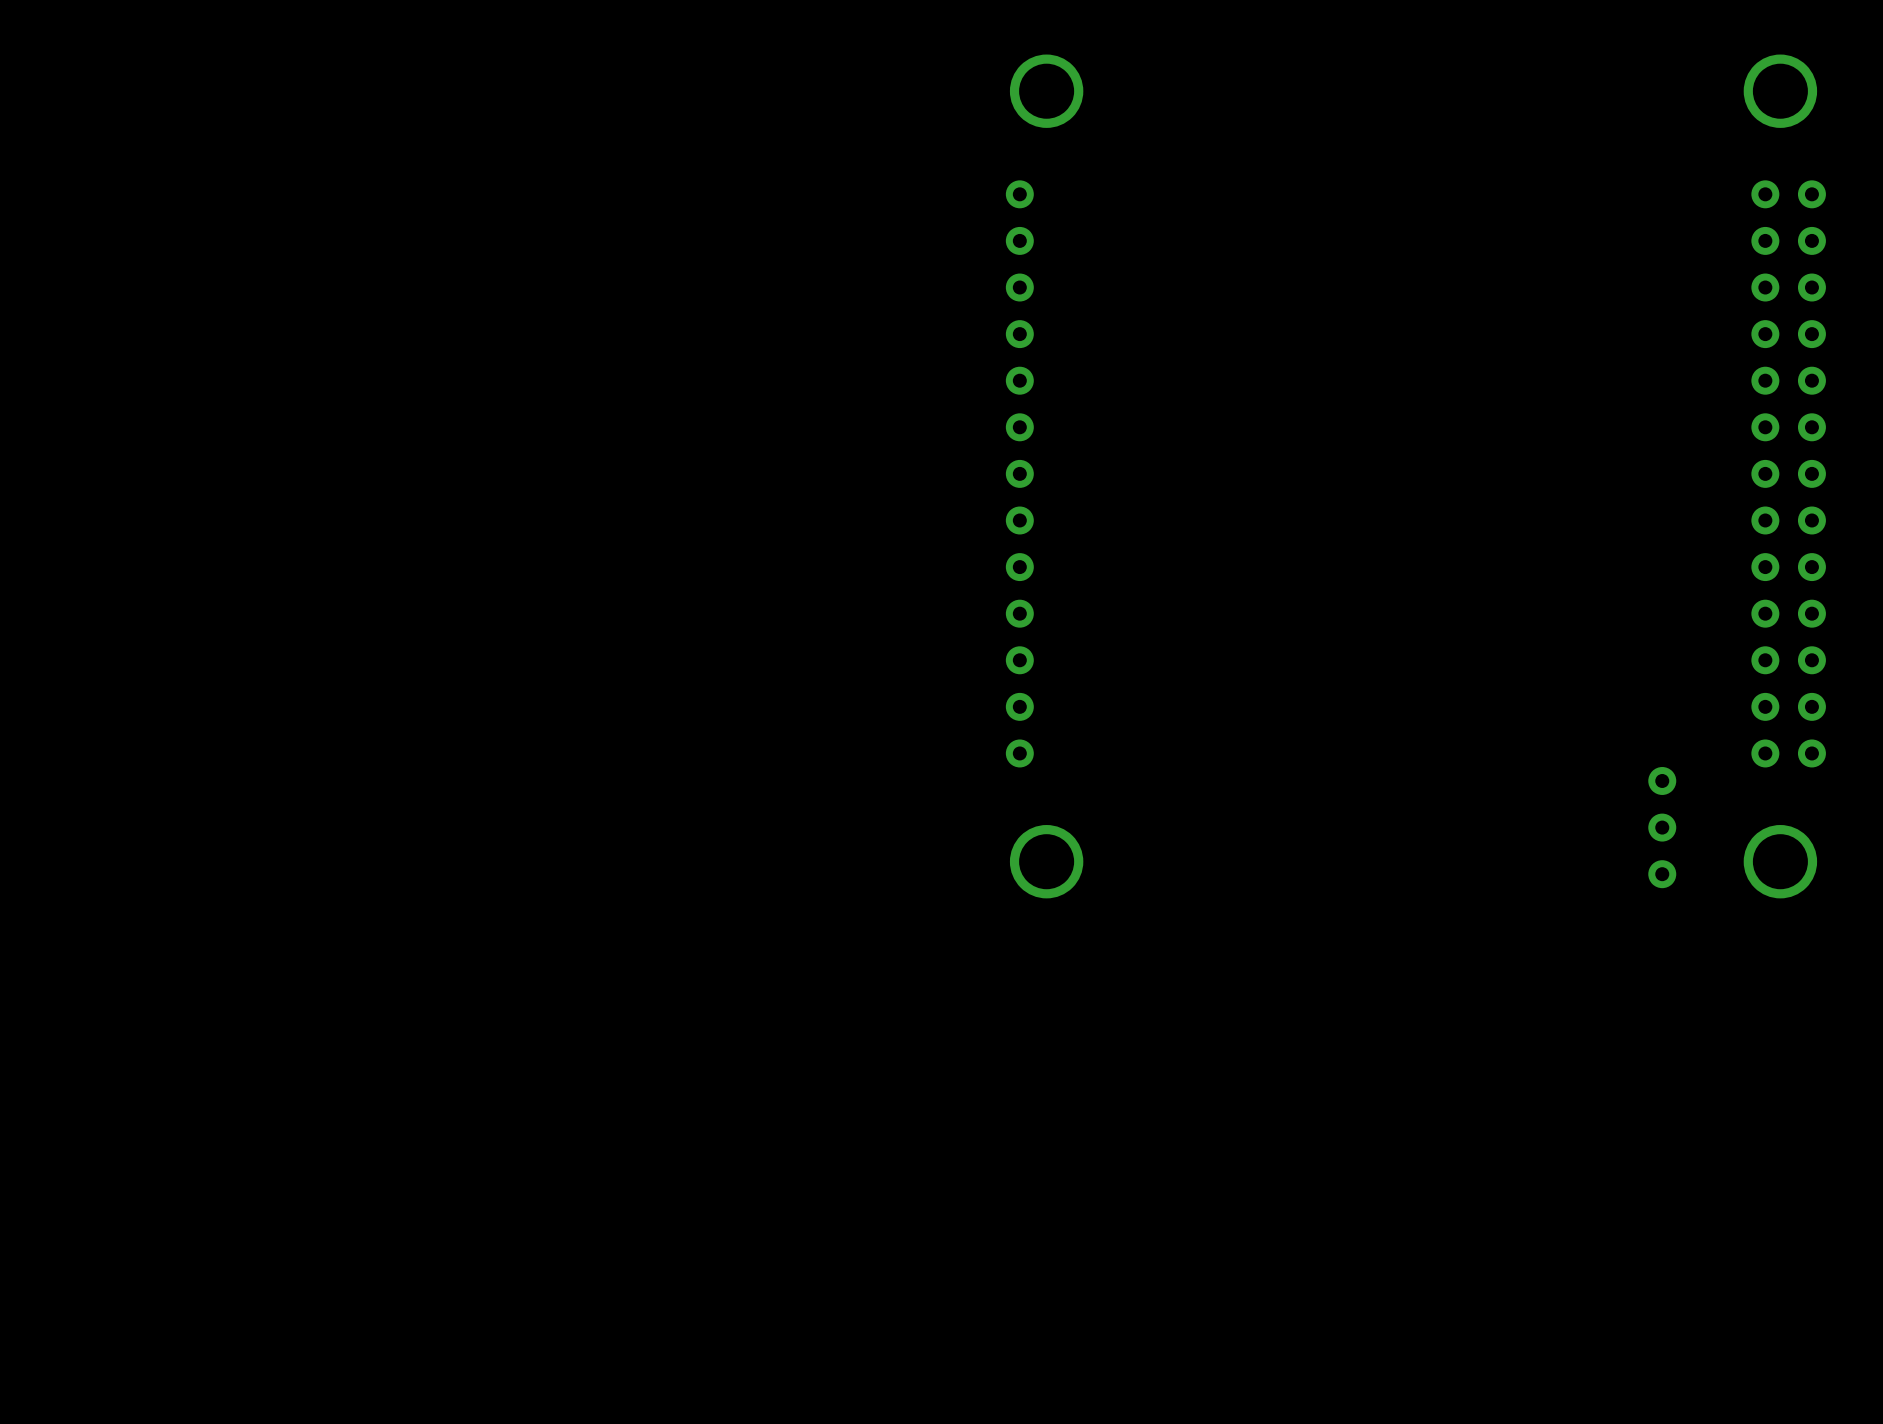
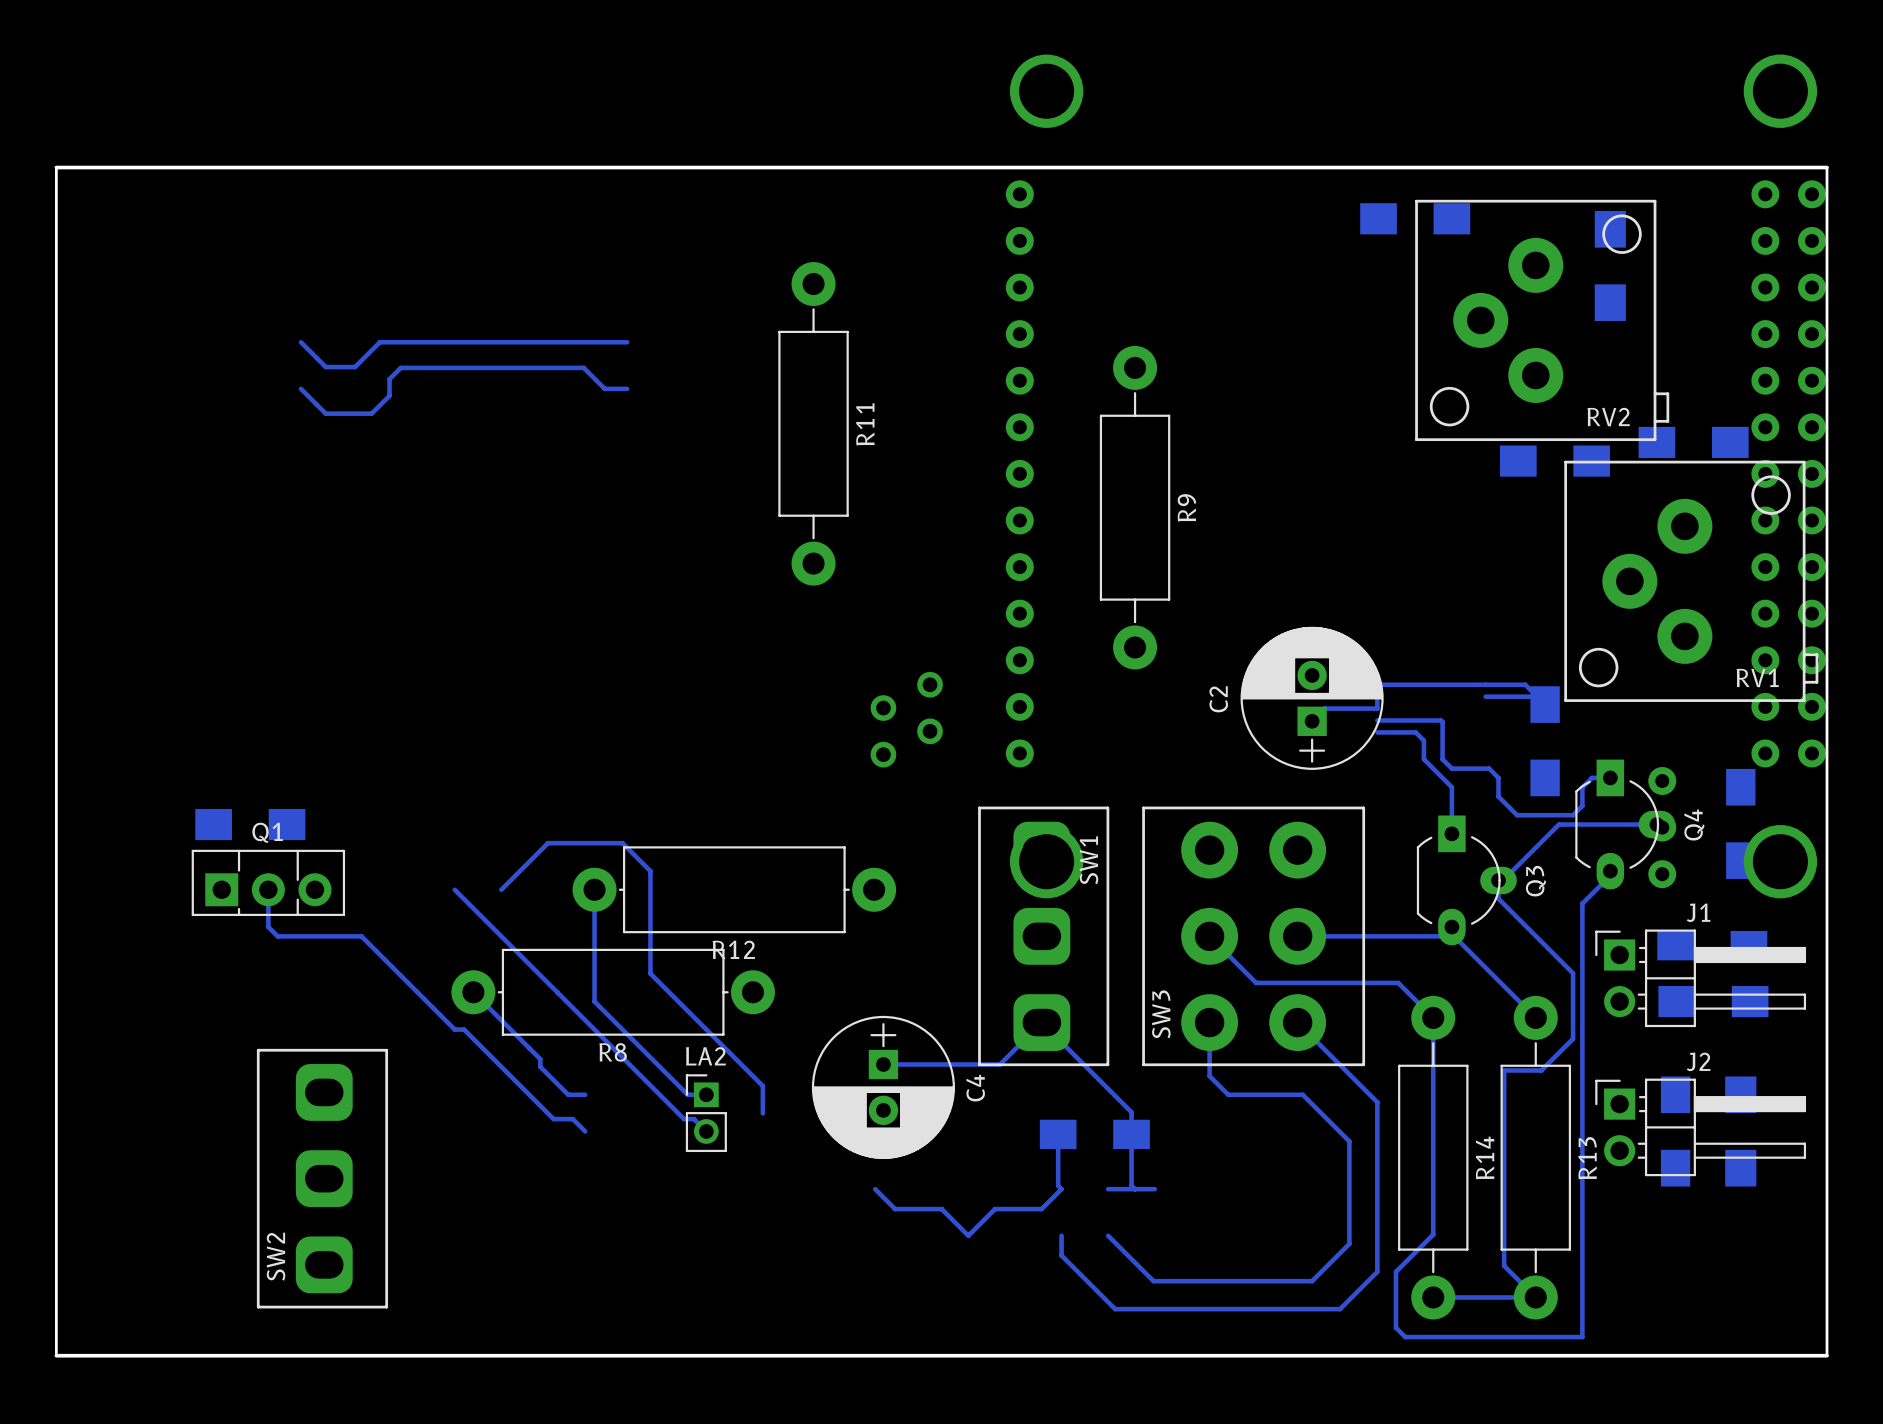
board edge: none -> (56, 167) (1827, 167) (1827, 1355) (56, 1355) (56, 167)
part: none -> (1415, 218)
part: none -> (1610, 265)
RV2: none -> (1542, 320)
bottom track: none -> (300, 342) (325, 367) (355, 367) (379, 342) (627, 342)
bottom track: none -> (300, 388) (325, 413) (371, 413) (389, 395) (389, 379) (400, 367) (583, 367) (604, 388) (627, 388)
R11: none -> (813, 423)
part: none -> (1693, 442)
part: none -> (1555, 461)
R9: none -> (1135, 507)
RV1: none -> (1691, 581)
bottom track: none -> (1485, 696) (1537, 696)
C2: none -> (1312, 698)
bottom track: none -> (1545, 704) (1525, 684) (1377, 684) (1377, 708) (1324, 708) (1312, 721)
part: none -> (906, 719)
bottom track: none -> (1377, 720) (1441, 720) (1442, 759) (1451, 768) (1489, 768) (1498, 777) (1498, 796) (1517, 815) (1573, 815) (1582, 805) (1582, 787) (1591, 777) (1610, 777)
bottom track: none -> (1377, 732) (1415, 732) (1423, 740) (1423, 759) (1451, 787) (1451, 833)
part: none -> (1545, 741)
part: none -> (1740, 823)
part: none -> (250, 824)
Q4: none -> (1625, 824)
bottom track: none -> (1656, 824) (1559, 824) (1503, 880) (1498, 880) (1498, 898) (1573, 973) (1573, 1038) (1541, 1070) (1504, 1070) (1504, 1265) (1535, 1297) (1433, 1297)
bottom track: none -> (1610, 871) (1610, 875) (1582, 903) (1582, 1337) (1405, 1337) (1395, 1327) (1395, 1271) (1433, 1234) (1433, 1017) (1398, 982) (1256, 982) (1209, 936)
Q3: none -> (1466, 880)
Q1: none -> (268, 882)
bottom track: none -> (268, 889) (268, 927) (277, 936) (361, 936) (454, 1029) (464, 1029) (553, 1119) (572, 1119) (585, 1131)
bottom track: none -> (454, 889) (684, 1119) (693, 1119) (706, 1131)
bottom track: none -> (501, 889) (547, 843) (622, 843) (650, 871) (650, 973) (762, 1086) (762, 1113)
bottom track: none -> (594, 889) (594, 1001) (687, 1094) (706, 1094)
R12: none -> (734, 889)
SW1: none -> (1043, 936)
SW3: none -> (1253, 936)
bottom track: none -> (1297, 936) (1442, 936) (1451, 927) (1451, 934) (1535, 1017)
part: none -> (1712, 945)
J1: none -> (1700, 978)
bottom track: none -> (473, 992) (540, 1059) (540, 1066) (568, 1094) (585, 1094)
R8: none -> (613, 992)
part: none -> (1713, 1001)
bottom track: none -> (1209, 1022) (1209, 1076) (1228, 1094) (1302, 1094) (1349, 1141) (1349, 1243) (1312, 1281) (1153, 1281) (1108, 1235)
bottom track: none -> (1297, 1022) (1377, 1102) (1377, 1271) (1340, 1309) (1115, 1309) (1061, 1255) (1061, 1235)
bottom track: none -> (883, 1064) (999, 1064) (1041, 1022) (1131, 1112) (1131, 1185) (1135, 1189)
C4: none -> (883, 1087)
LA2: none -> (706, 1113)
J2: none -> (1700, 1127)
part: none -> (1675, 1131)
part: none -> (1740, 1131)
bottom track: none -> (1058, 1134) (1058, 1185) (1061, 1189) (1041, 1209) (995, 1209) (968, 1235) (941, 1209) (895, 1209) (875, 1189)
part: none -> (1094, 1134)
R14: none -> (1433, 1157)
R13: none -> (1535, 1157)
SW2: none -> (322, 1178)
bottom track: none -> (1108, 1189) (1154, 1189)

